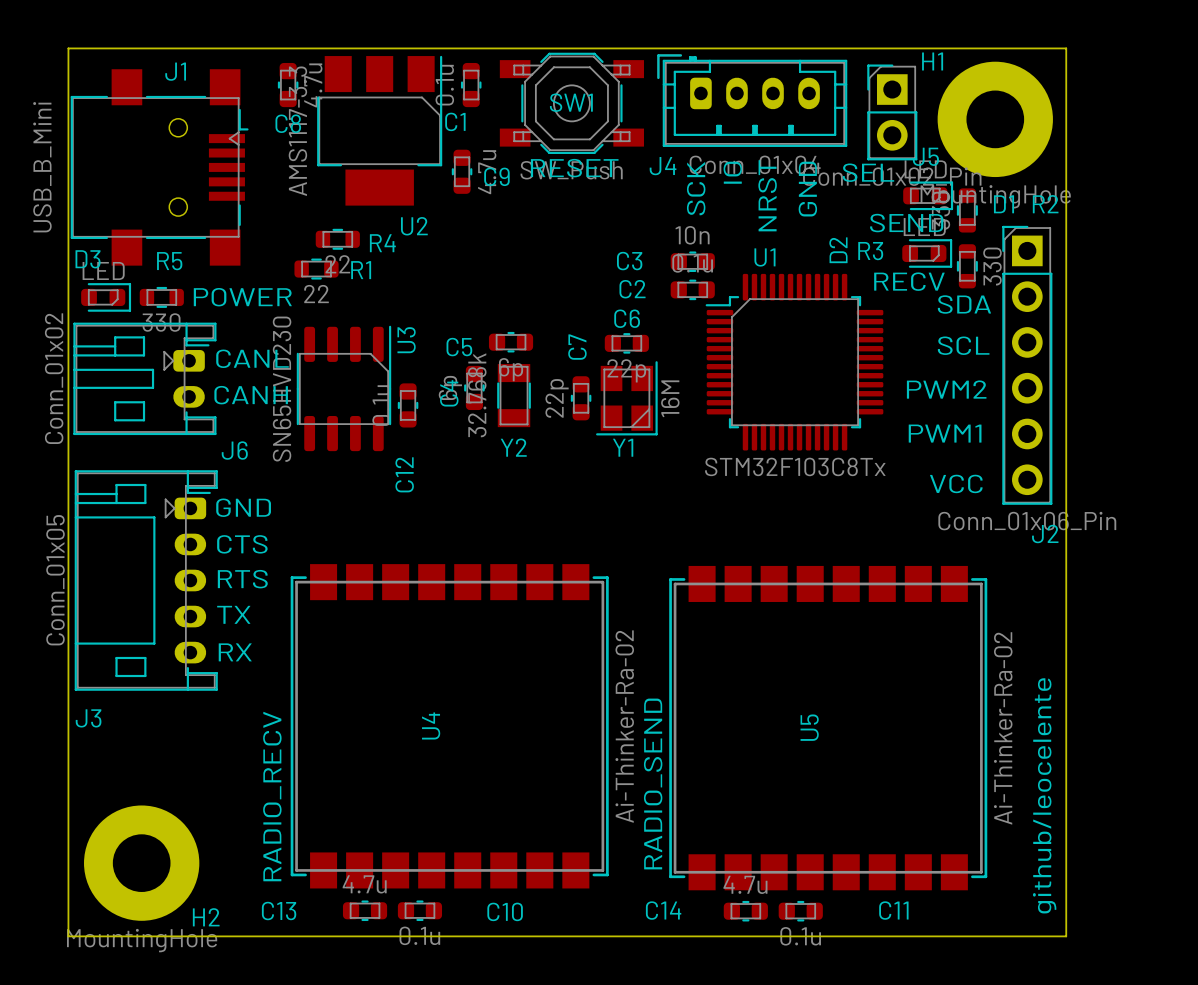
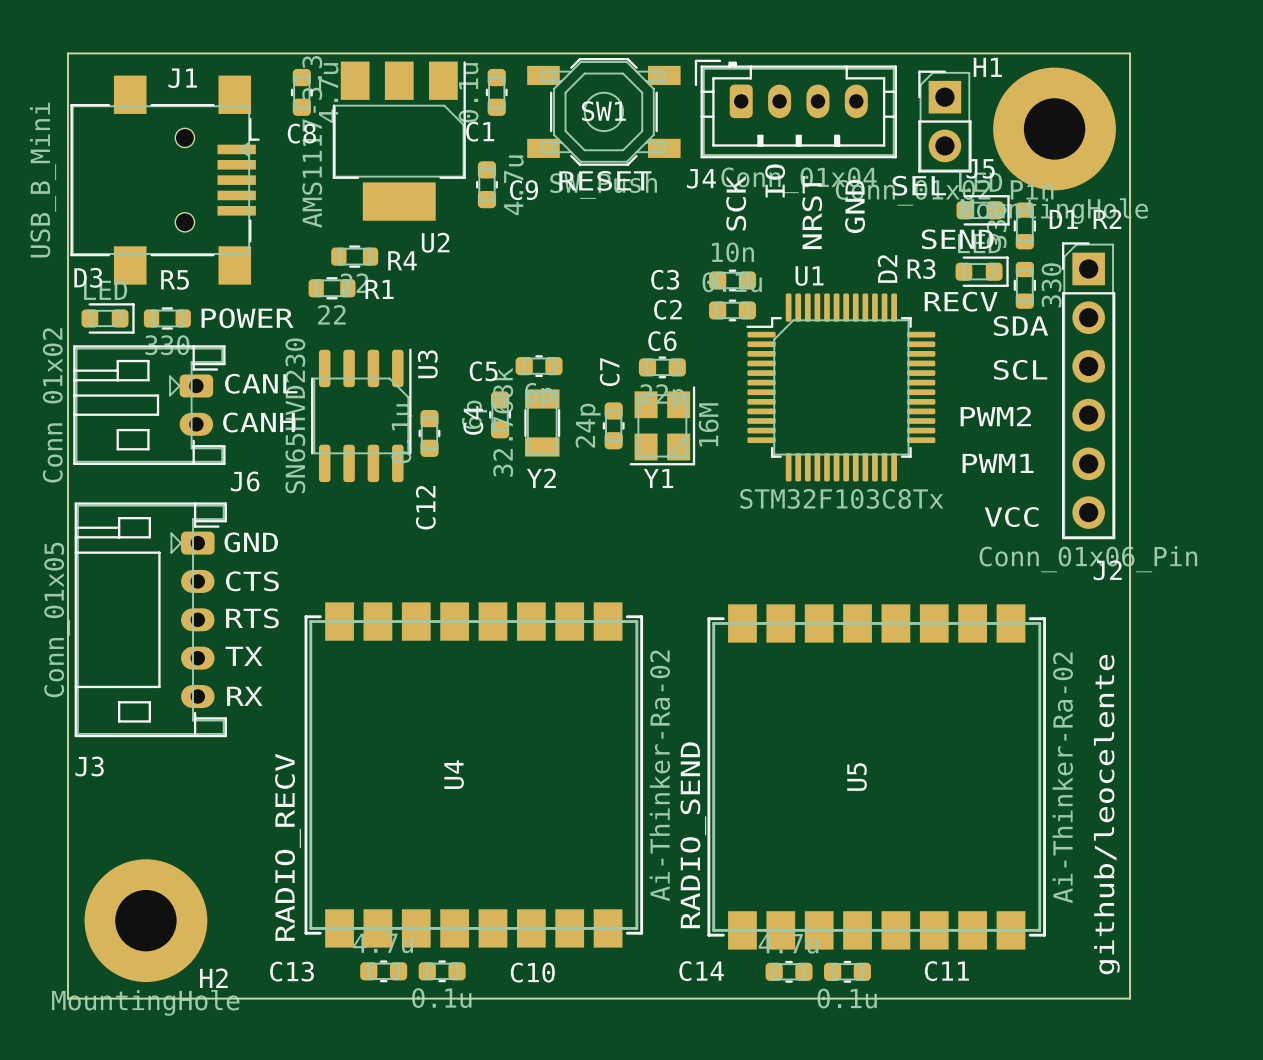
C7 value: 22p (557, 398) -> 24p (588, 425)

